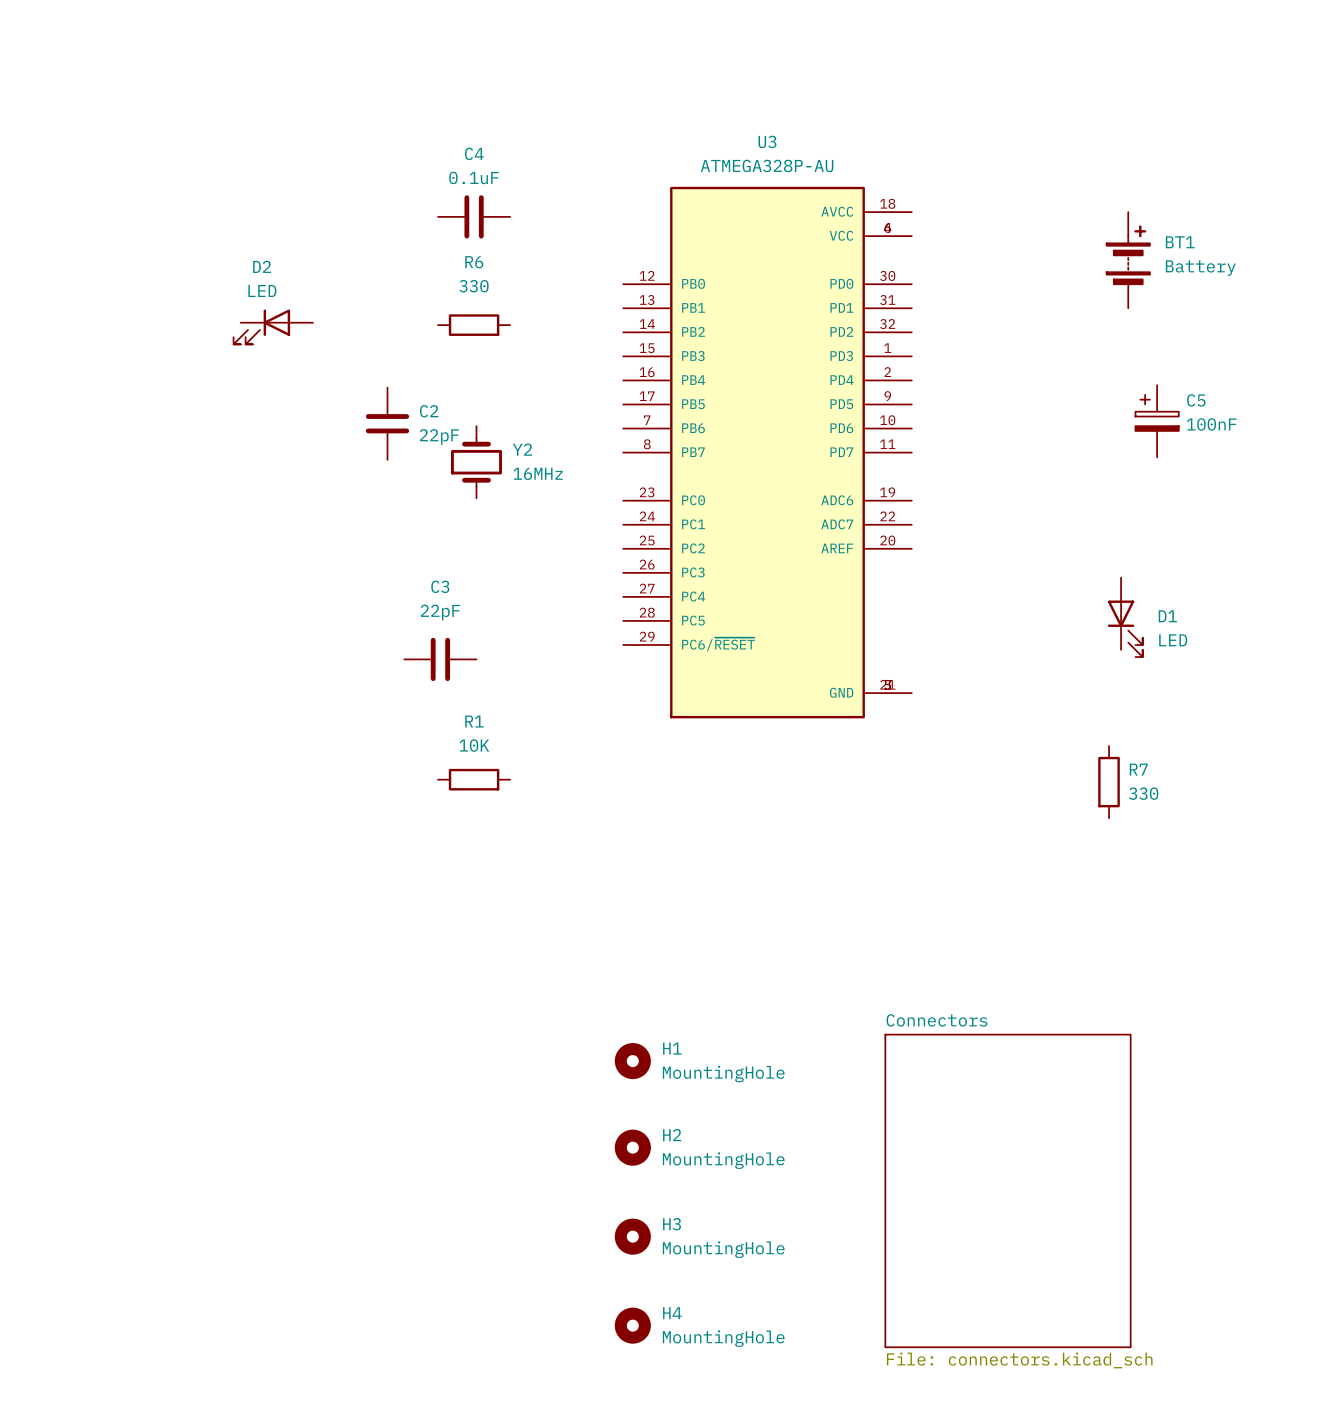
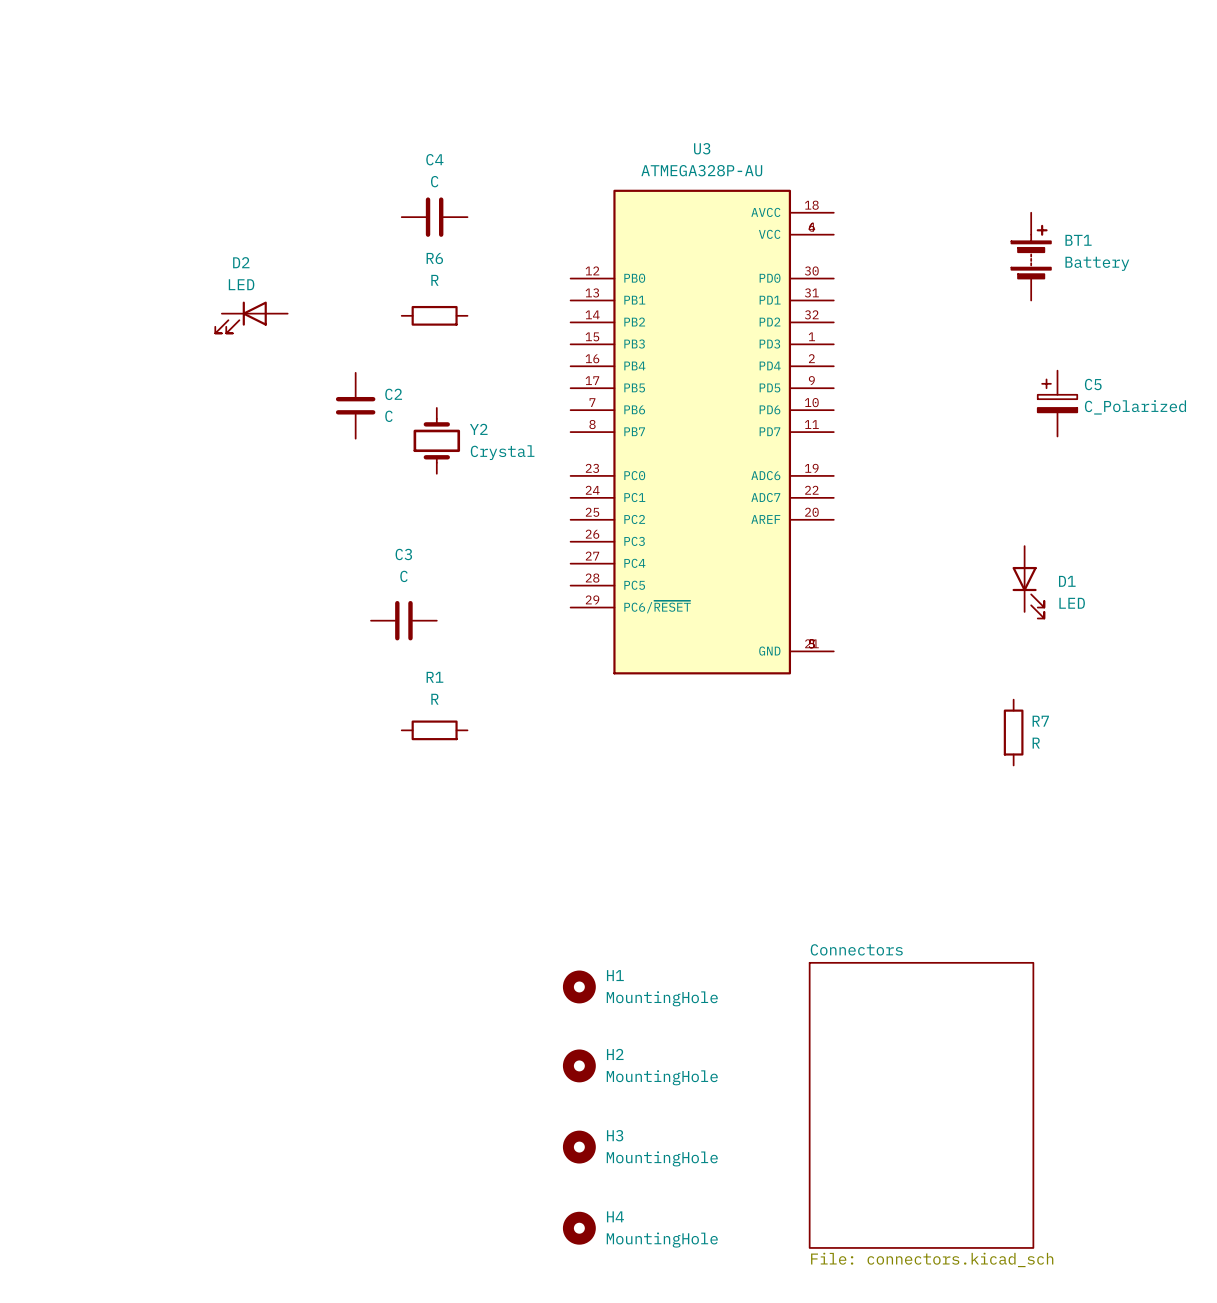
C4 value: 0.1uF (473, 177) -> C (434, 181)
R6 value: 330 (474, 286) -> R (434, 280)
C5 value: 100nF (1211, 424) -> C_Polarized (1135, 407)
C2 value: 22pF (439, 436) -> C (388, 416)
Y2 value: 16MHz (538, 473) -> Crystal (502, 452)
C3 value: 22pF (440, 612) -> C (403, 576)
R1 value: 10K (474, 745) -> R (434, 699)
R7 value: 330 (1143, 793) -> R (1036, 743)

